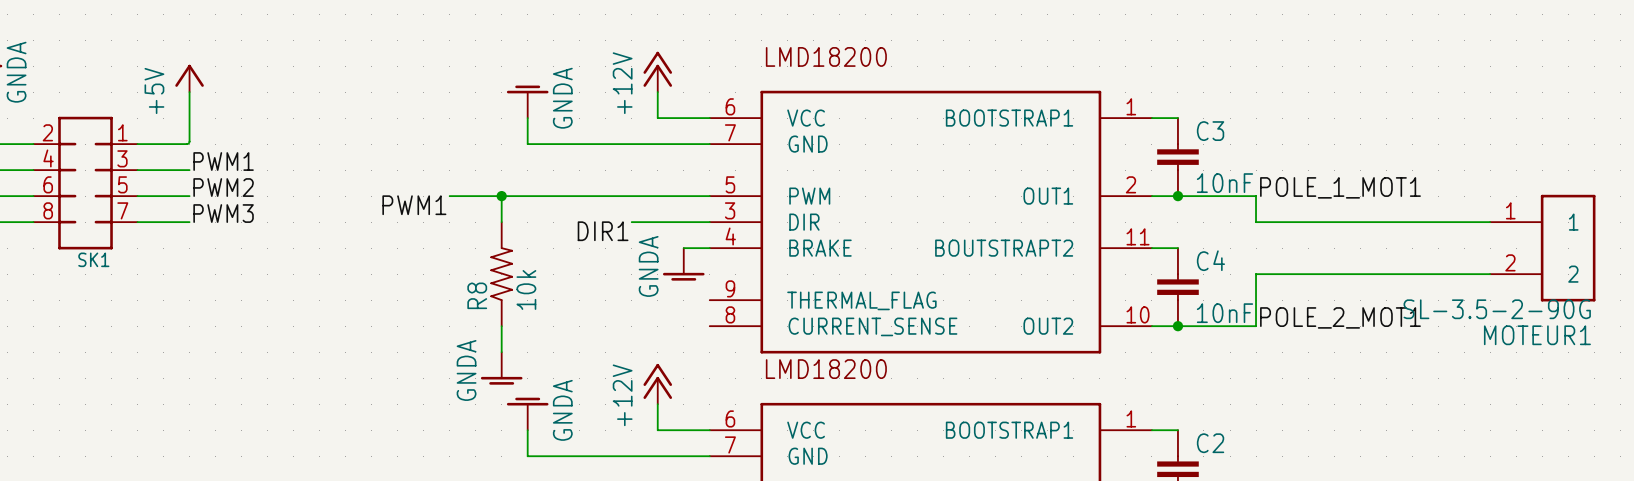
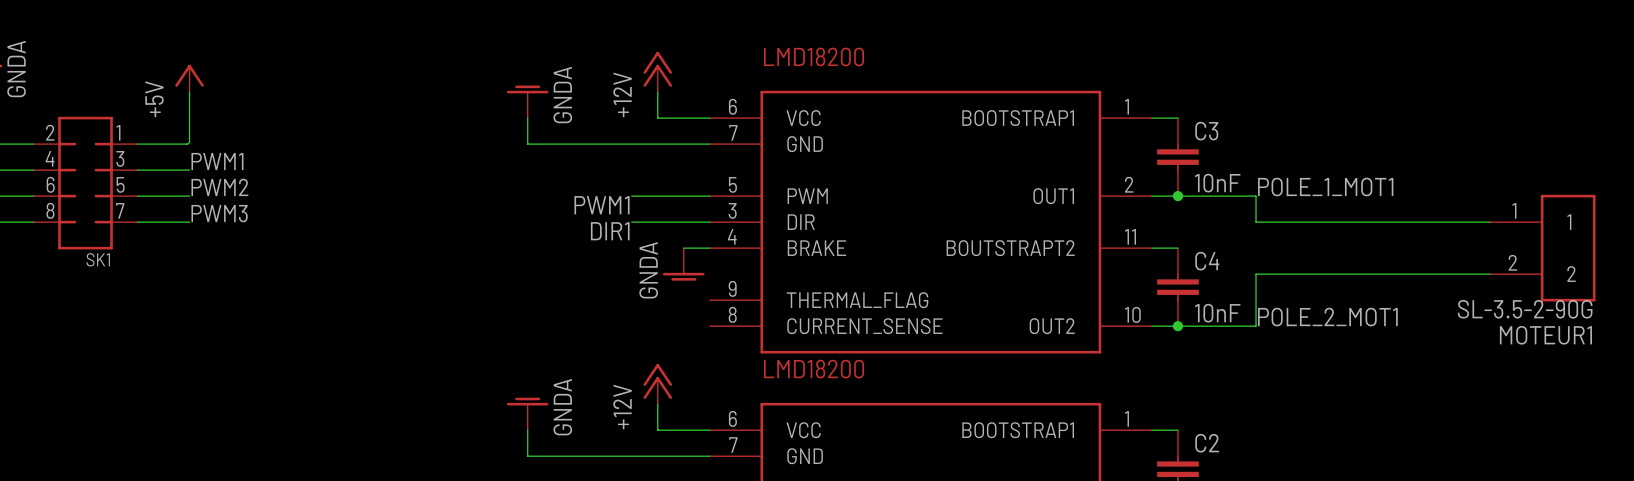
wire: (449, 196) (631, 196) -> none
wire: (501, 196) (501, 222) -> none
junction: (501, 196) -> none
label position: PWM1 (414, 205) -> PWM1 (602, 205)
R8: 10k (501, 274) -> none
wire: (501, 326) (501, 352) -> none
power symbol: GNDA (501, 368) -> none

